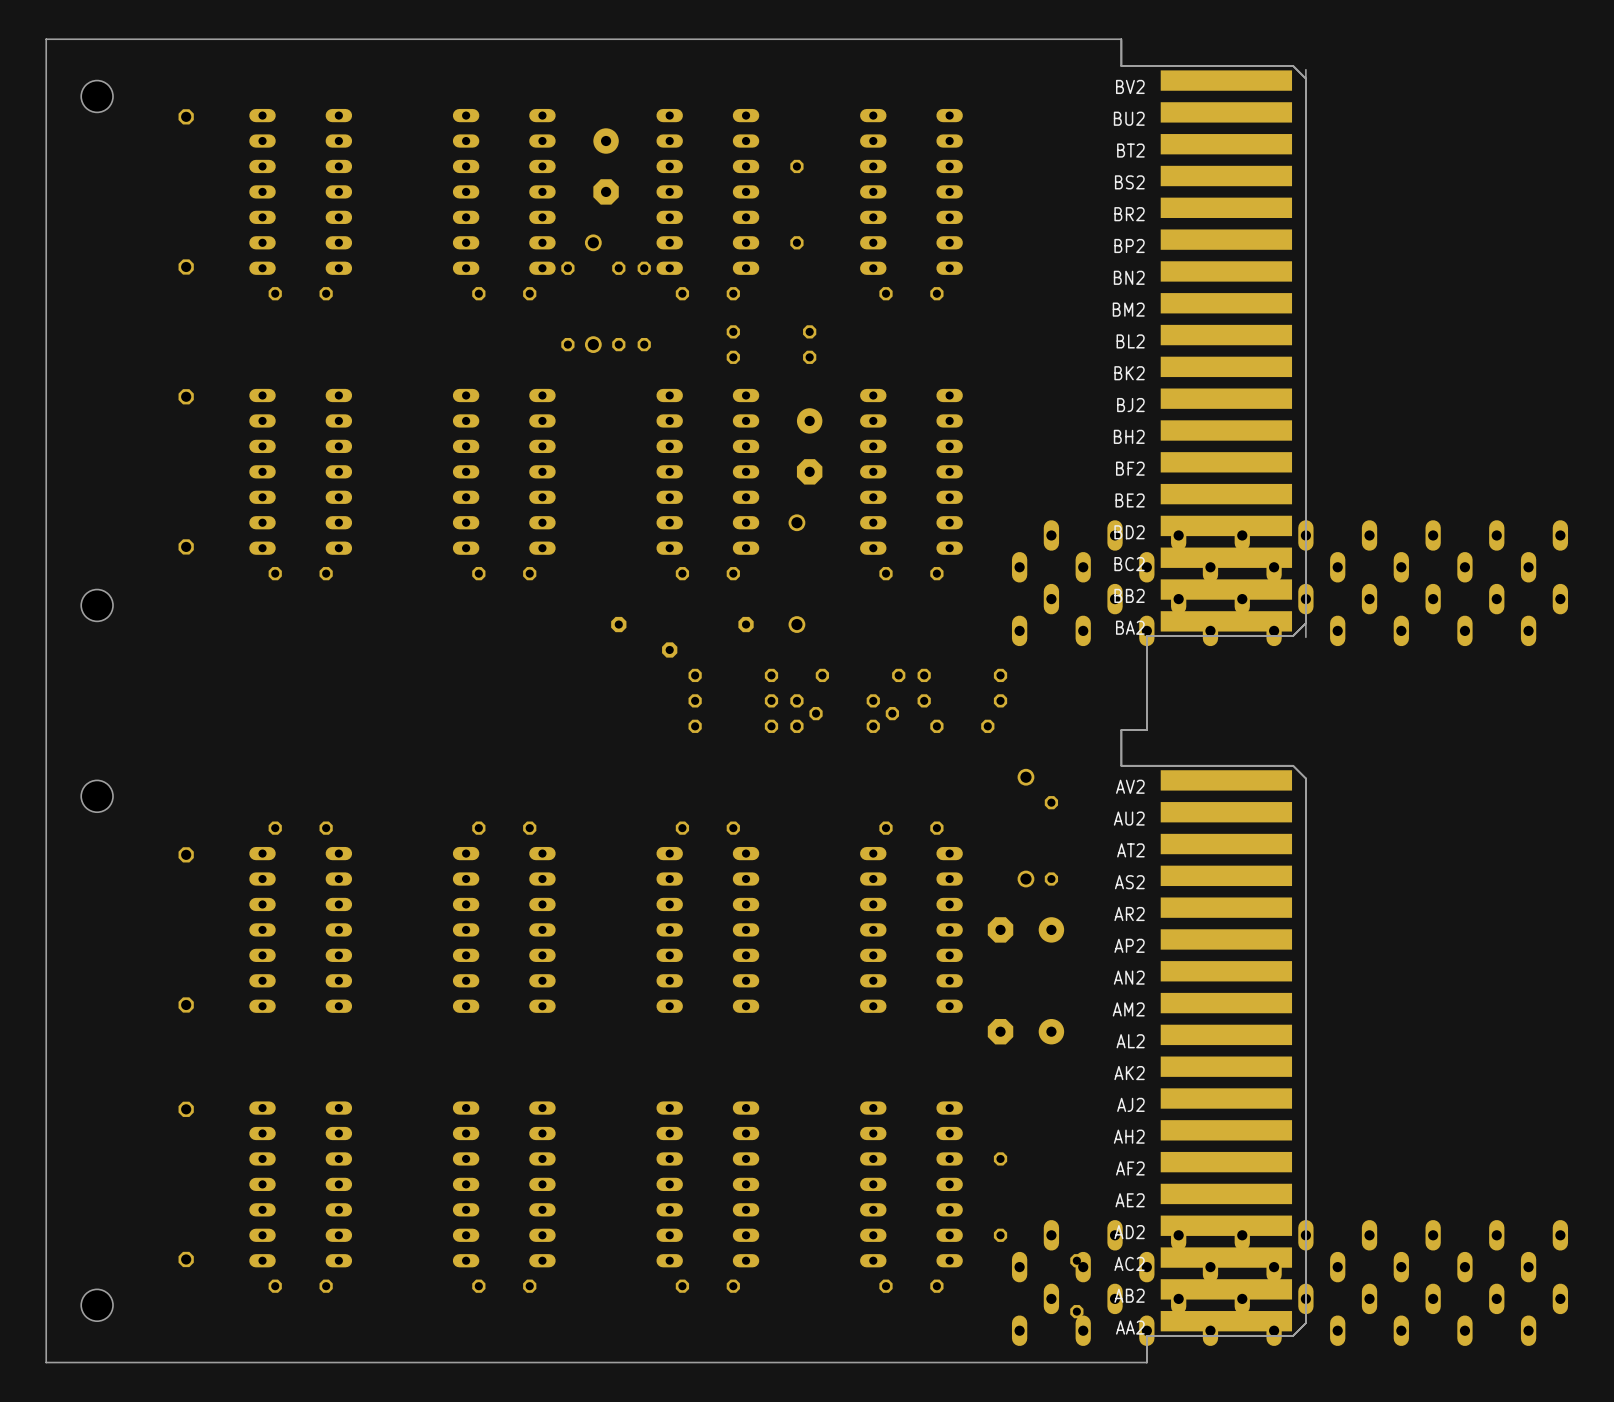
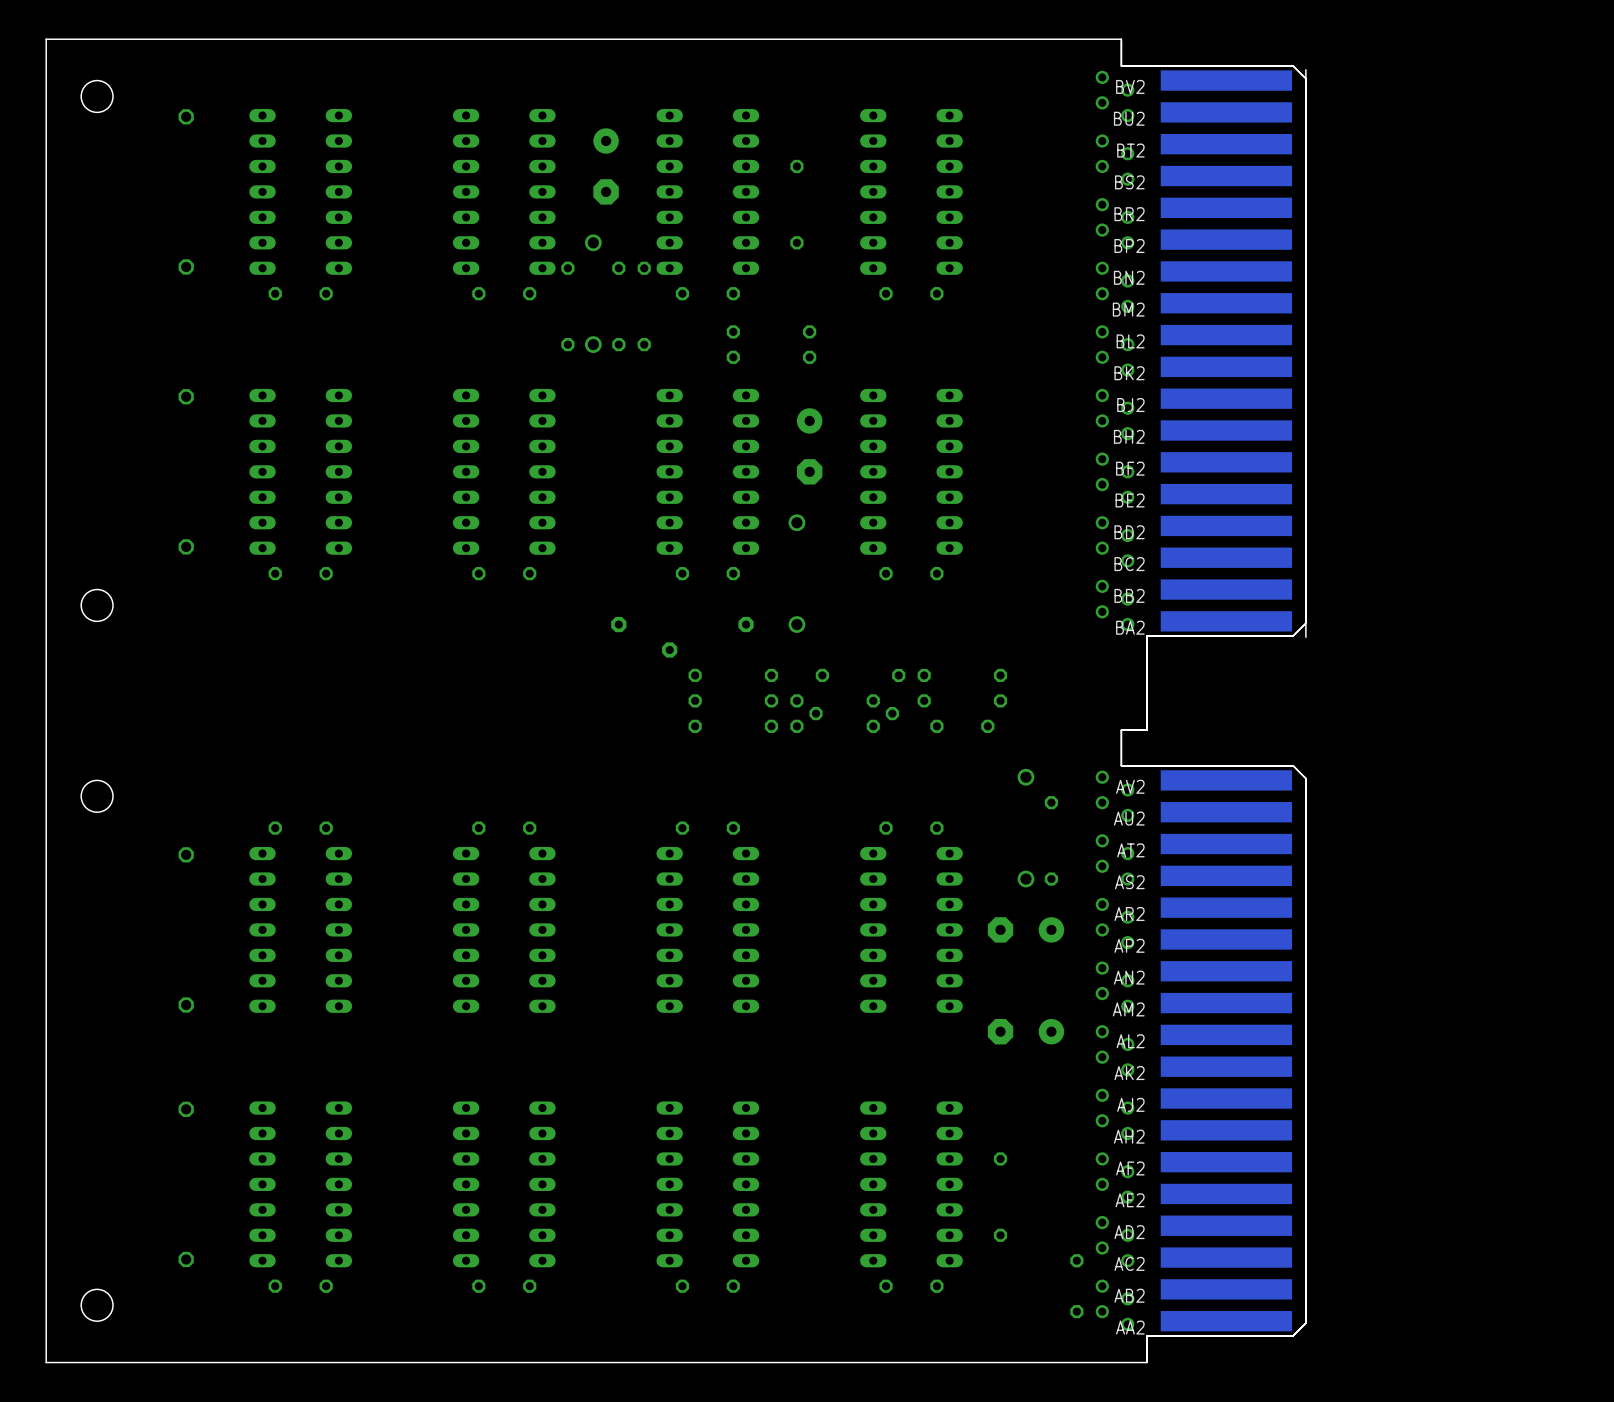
part: none -> (1115, 350)
part: (1289, 583) -> none
part: none -> (1115, 1050)
part: (1289, 1283) -> none

